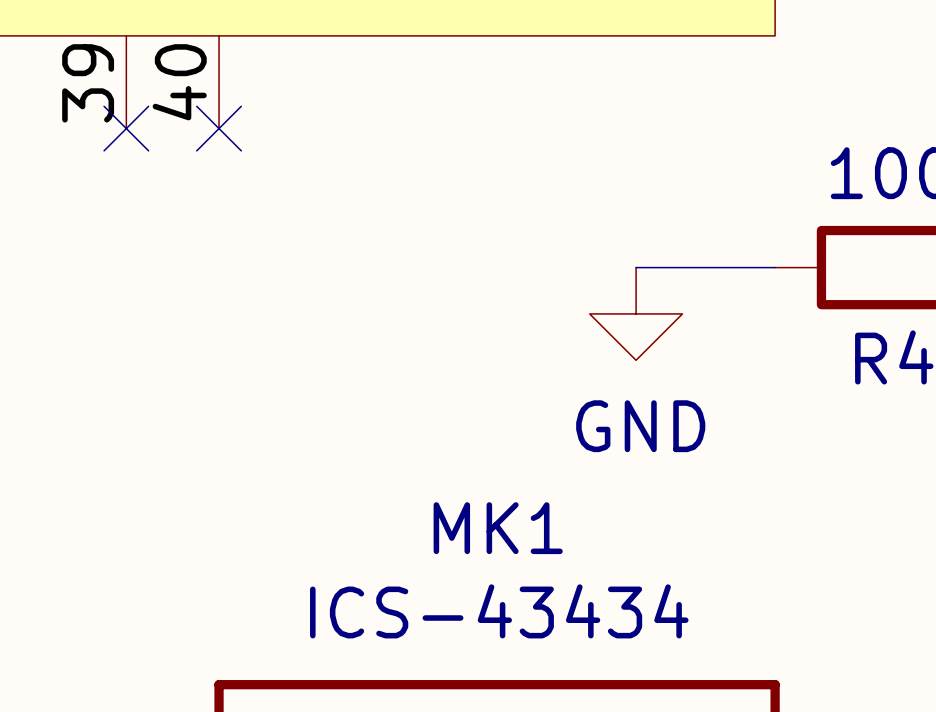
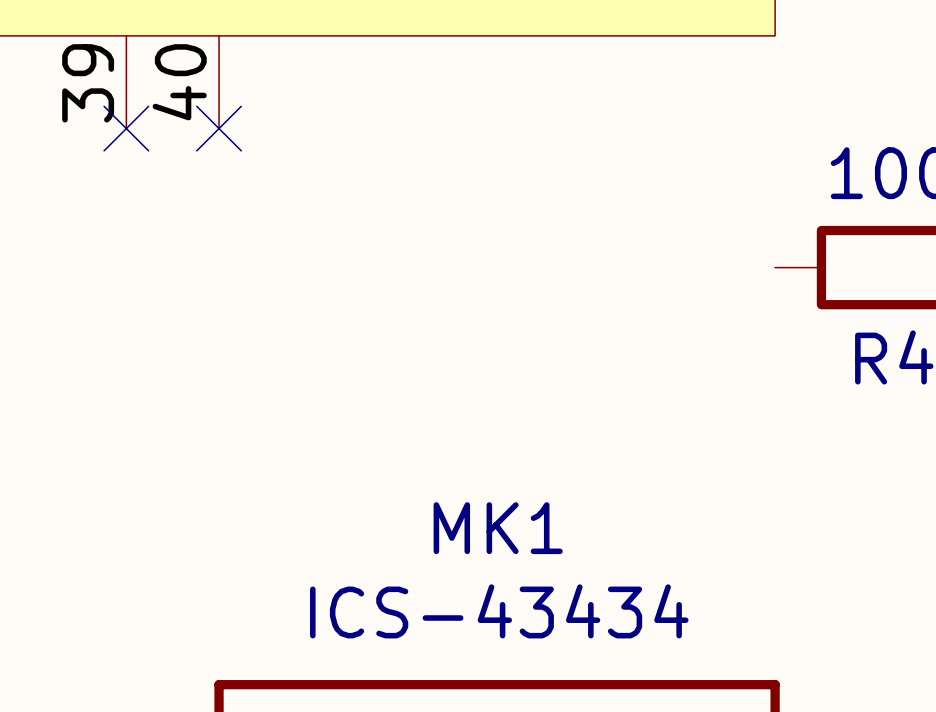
wire: (636, 267) (775, 267) -> none
power symbol: GND (636, 313) -> none

